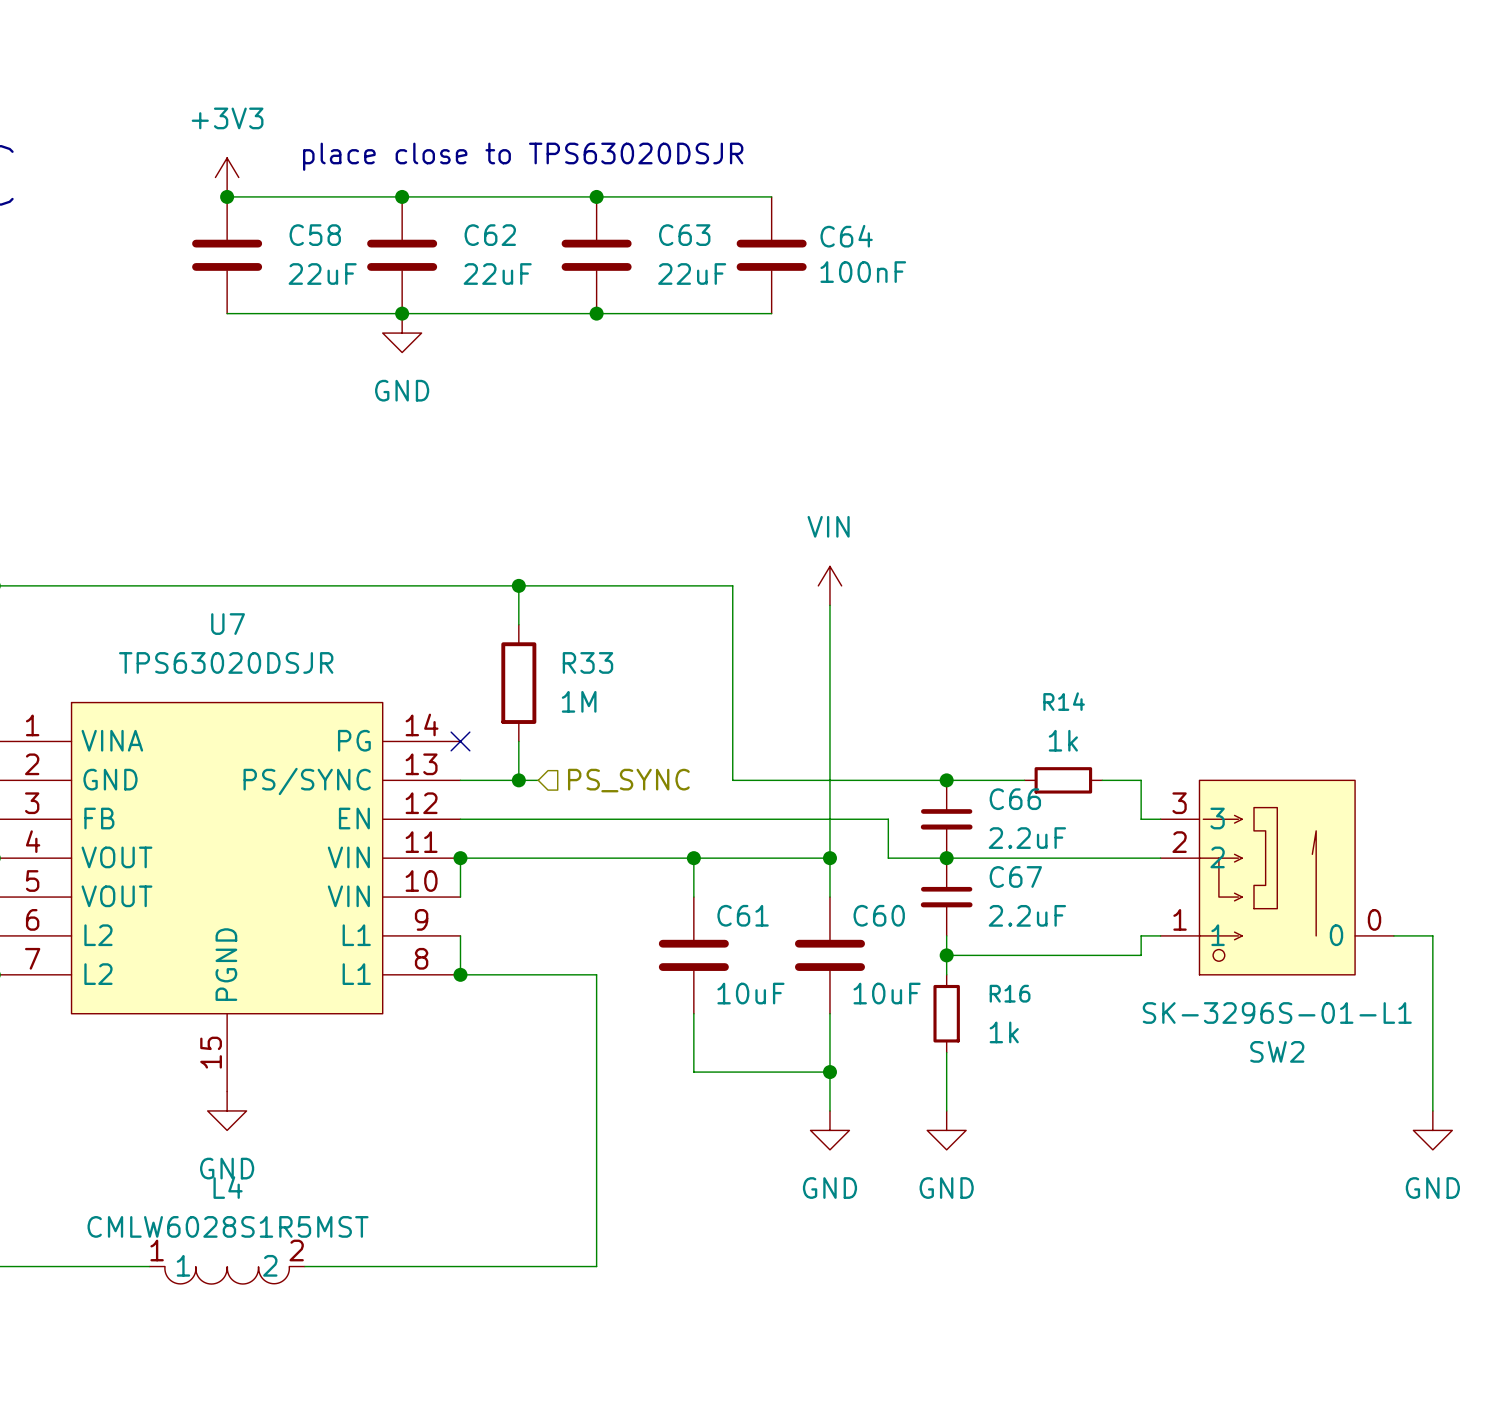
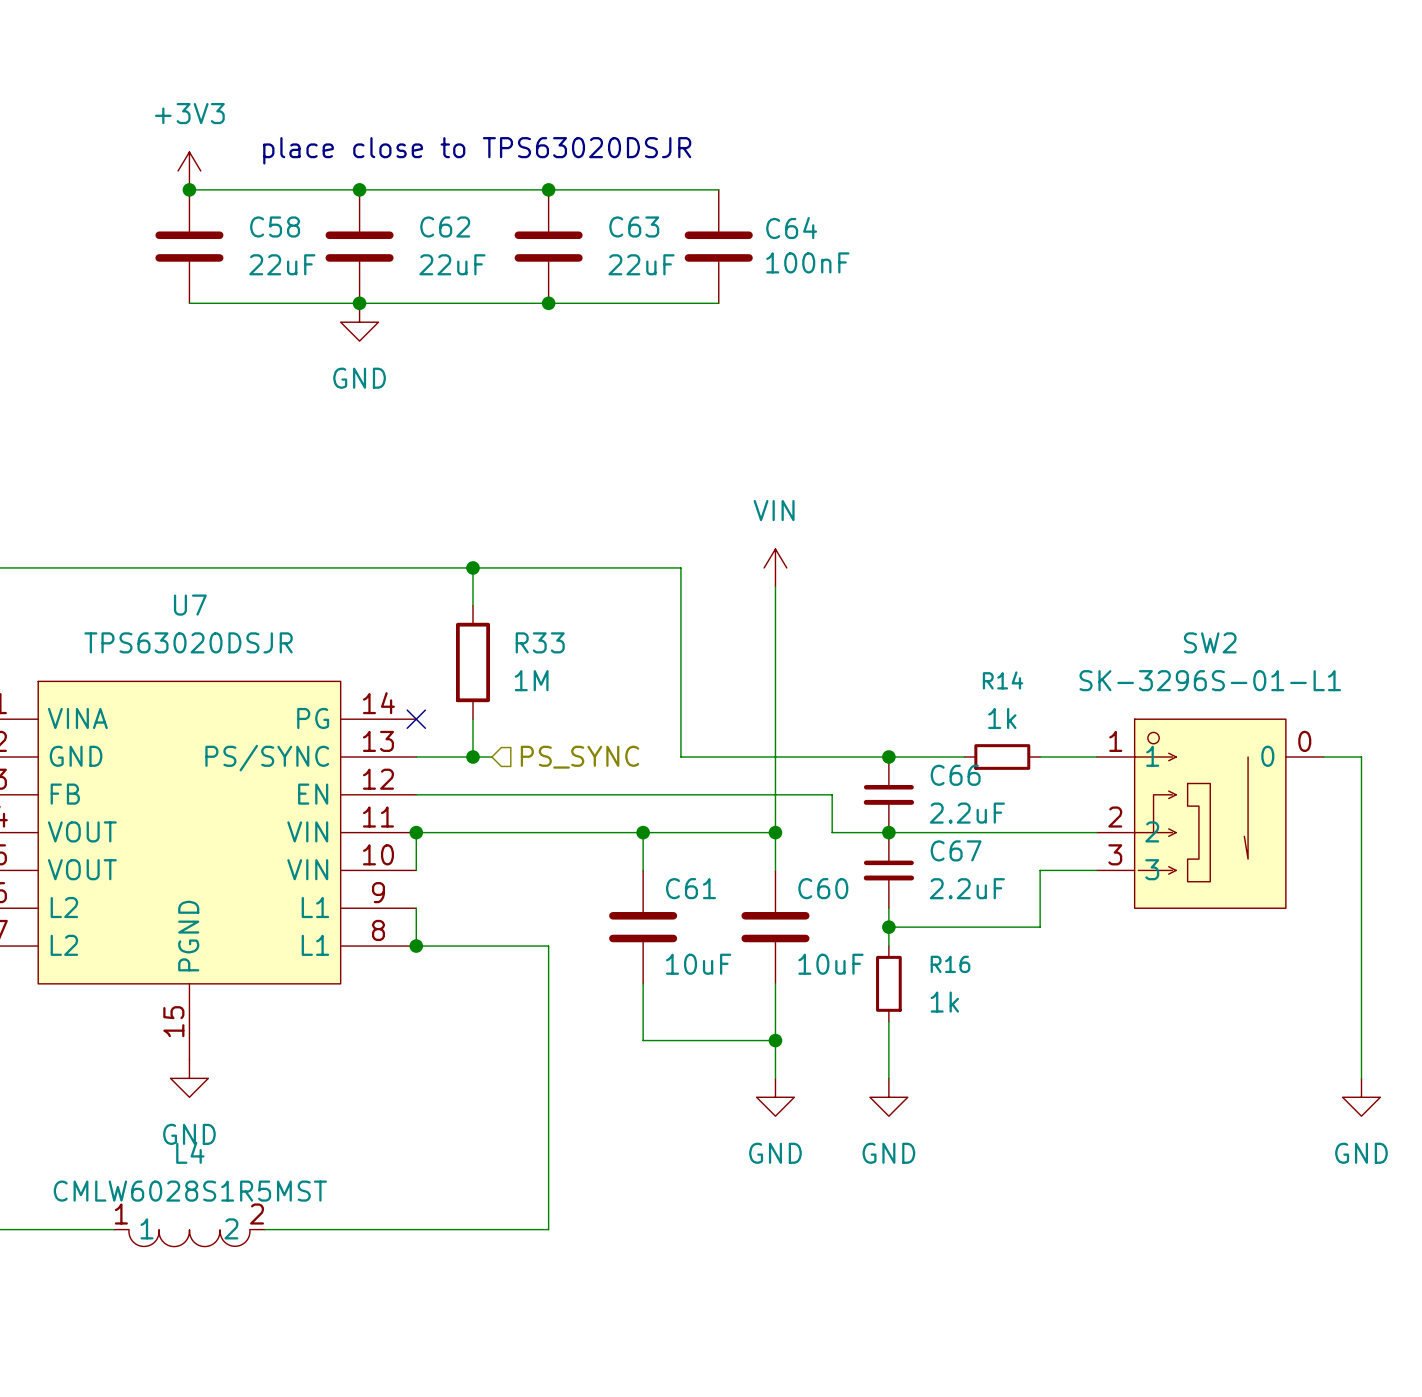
wire: (1141, 780) (1141, 819) (1160, 819) -> (1077, 757) (1096, 757)
SW2 flip: as is (1277, 877) -> up-down (1210, 813)
wire: (1160, 935) (1141, 935) (1141, 955) (1102, 955) -> (1096, 870) (1040, 870) (1040, 927)
wire: (1393, 935) (1432, 935) -> (1323, 757) (1361, 757) (1361, 908)

